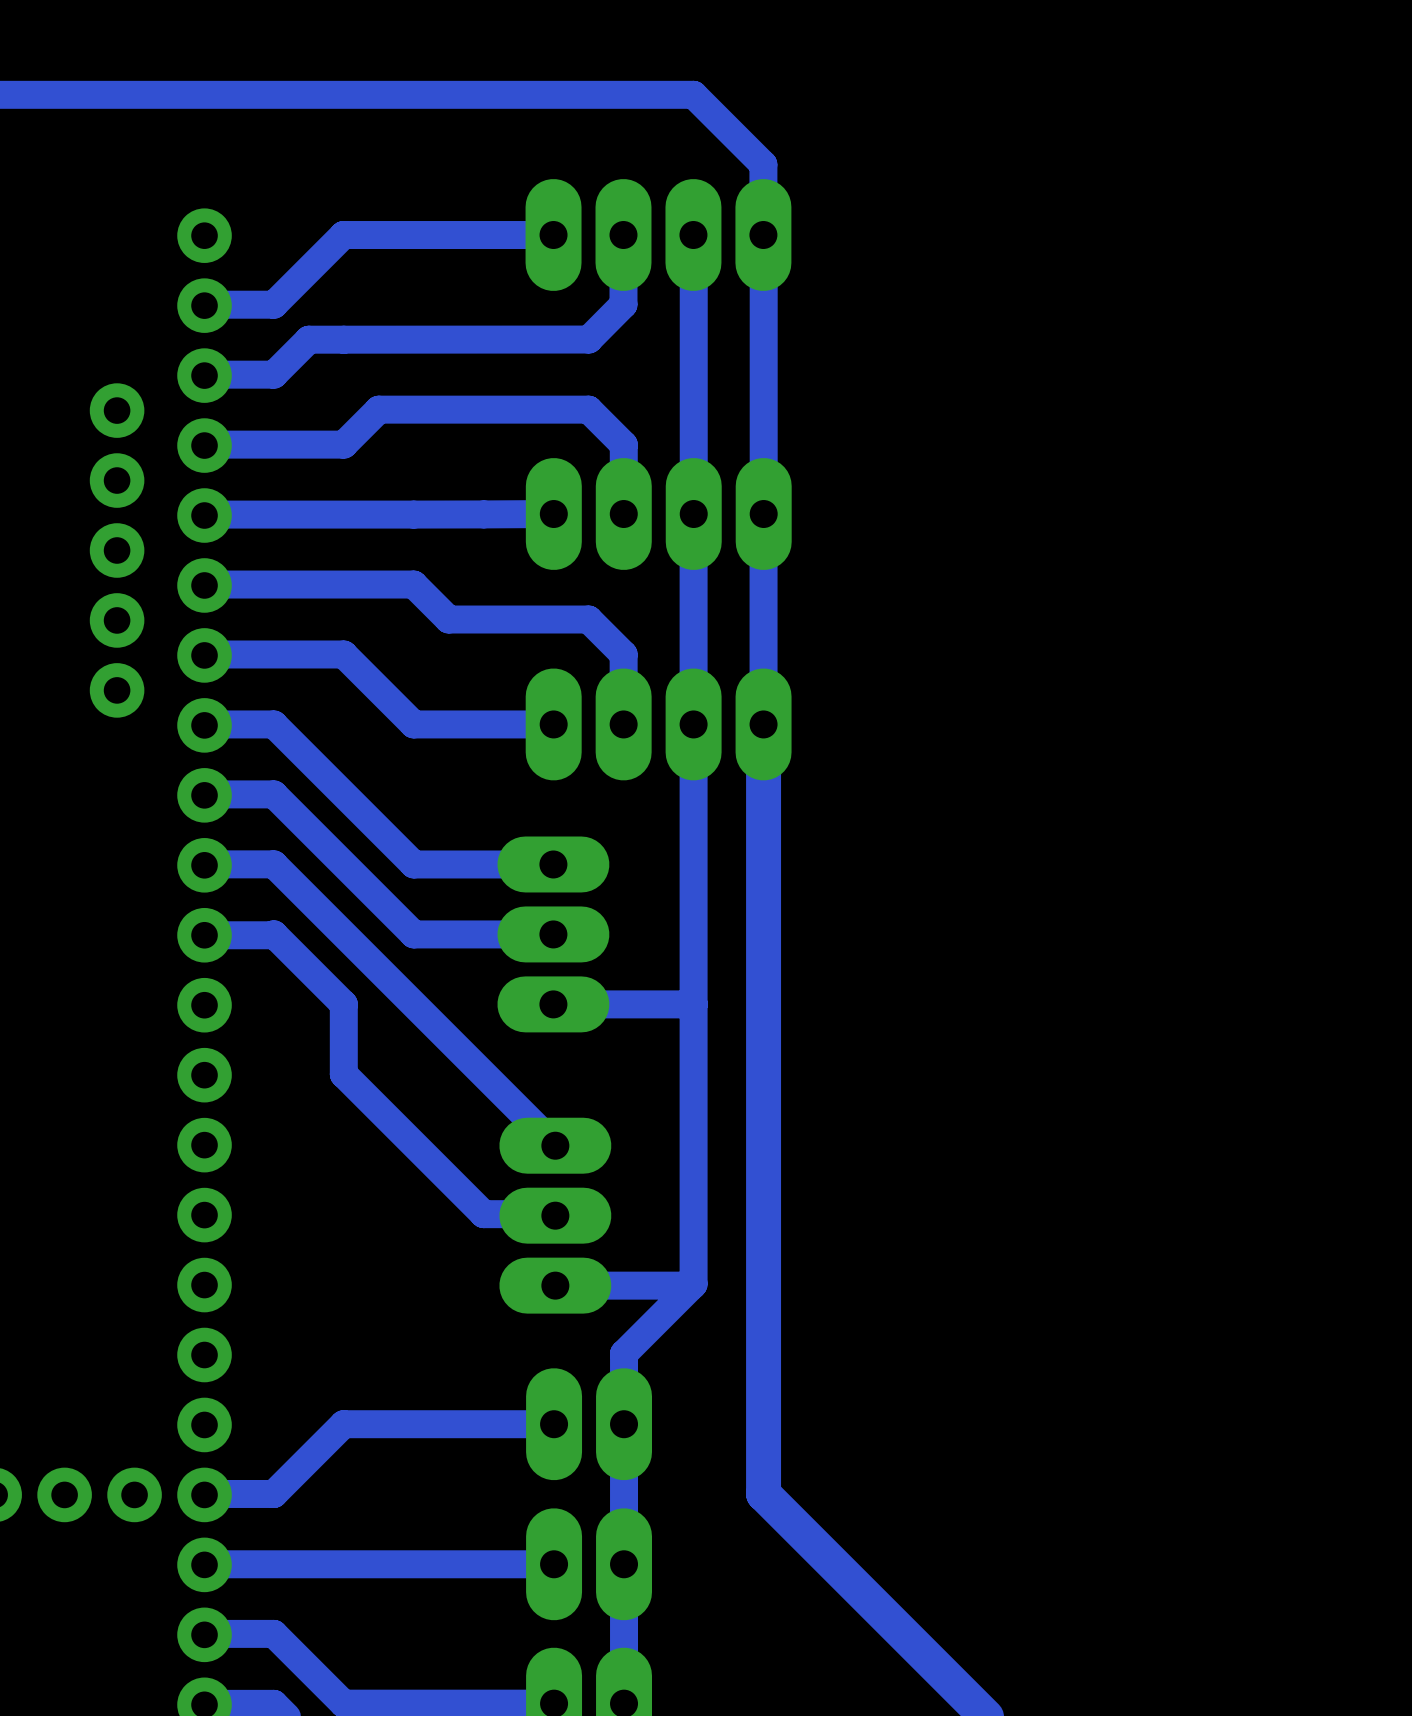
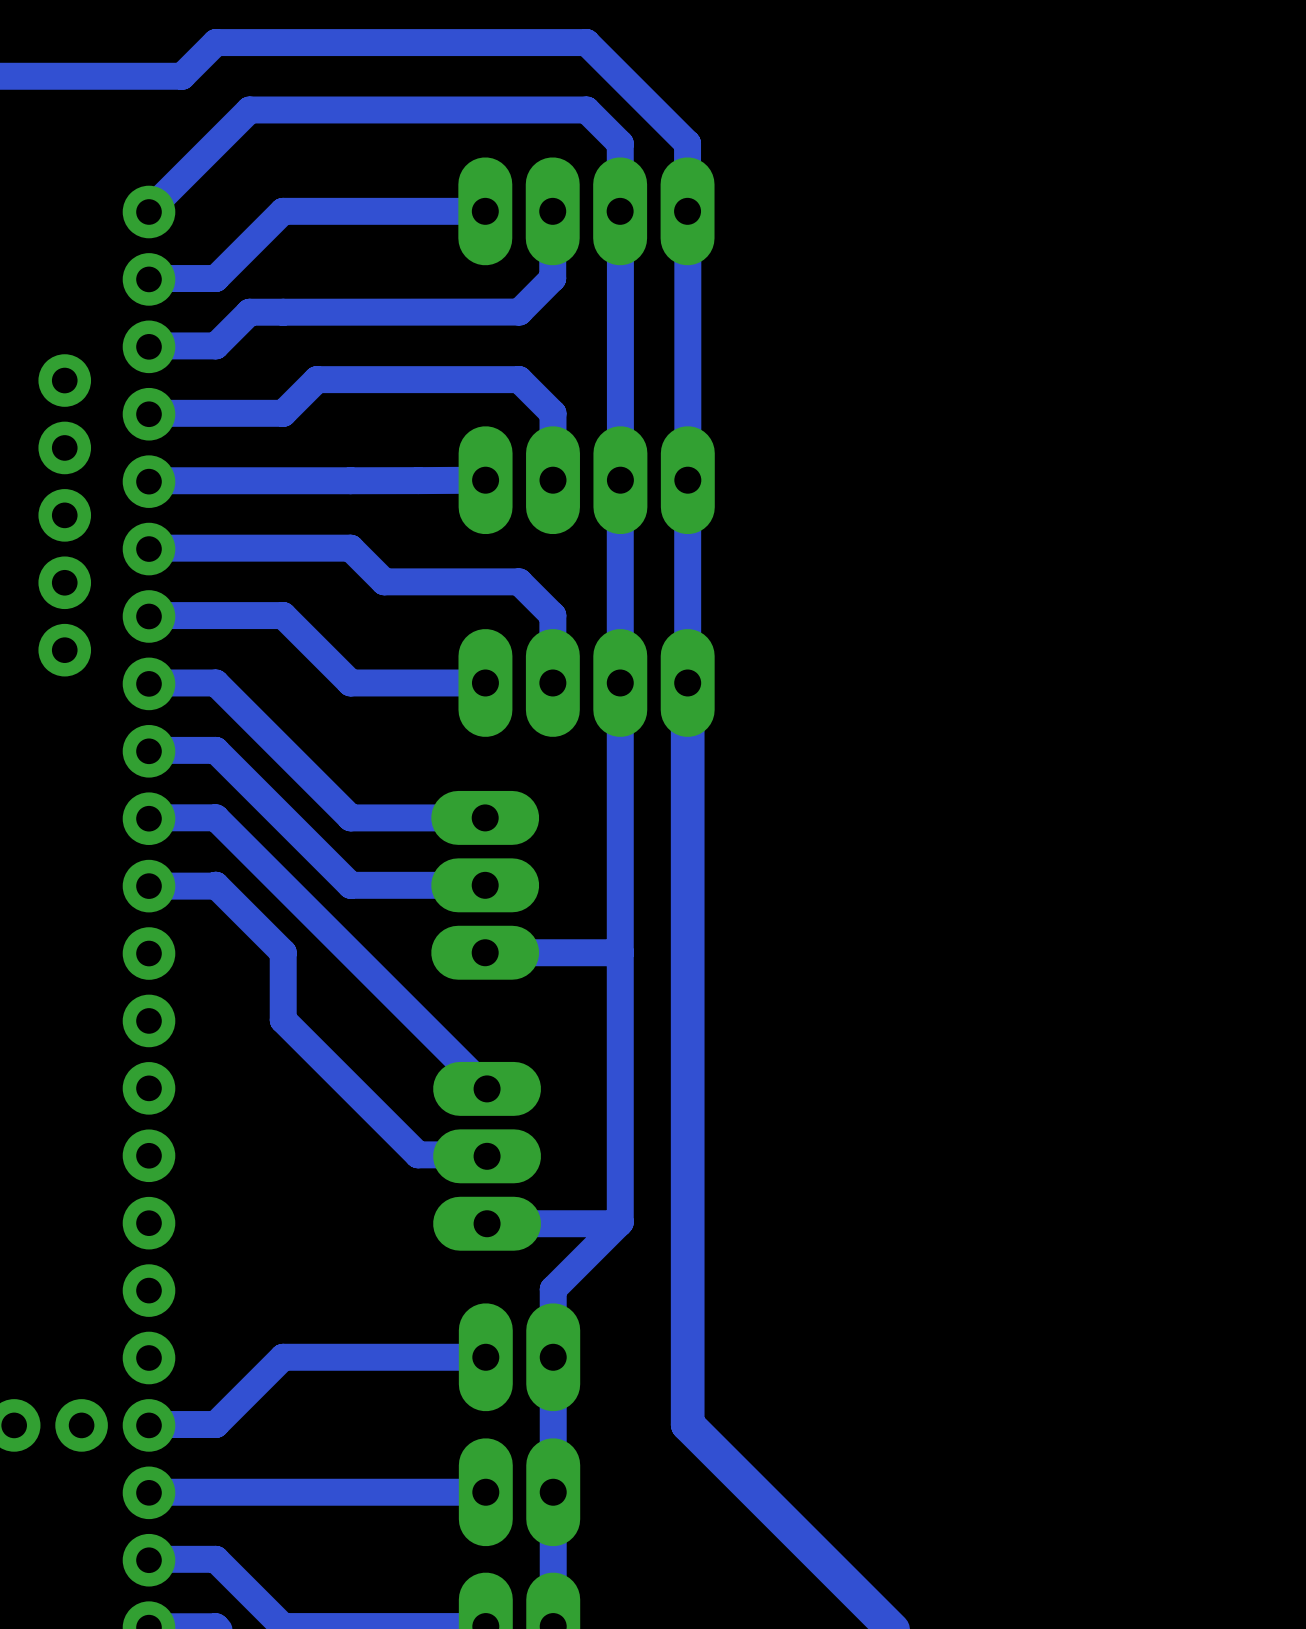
track: (693, 94) (238, 94) -> (620, 76) (586, 42) (215, 42) (182, 76)
track: none -> (620, 211) (620, 143) (586, 109) (249, 109) (149, 212)

